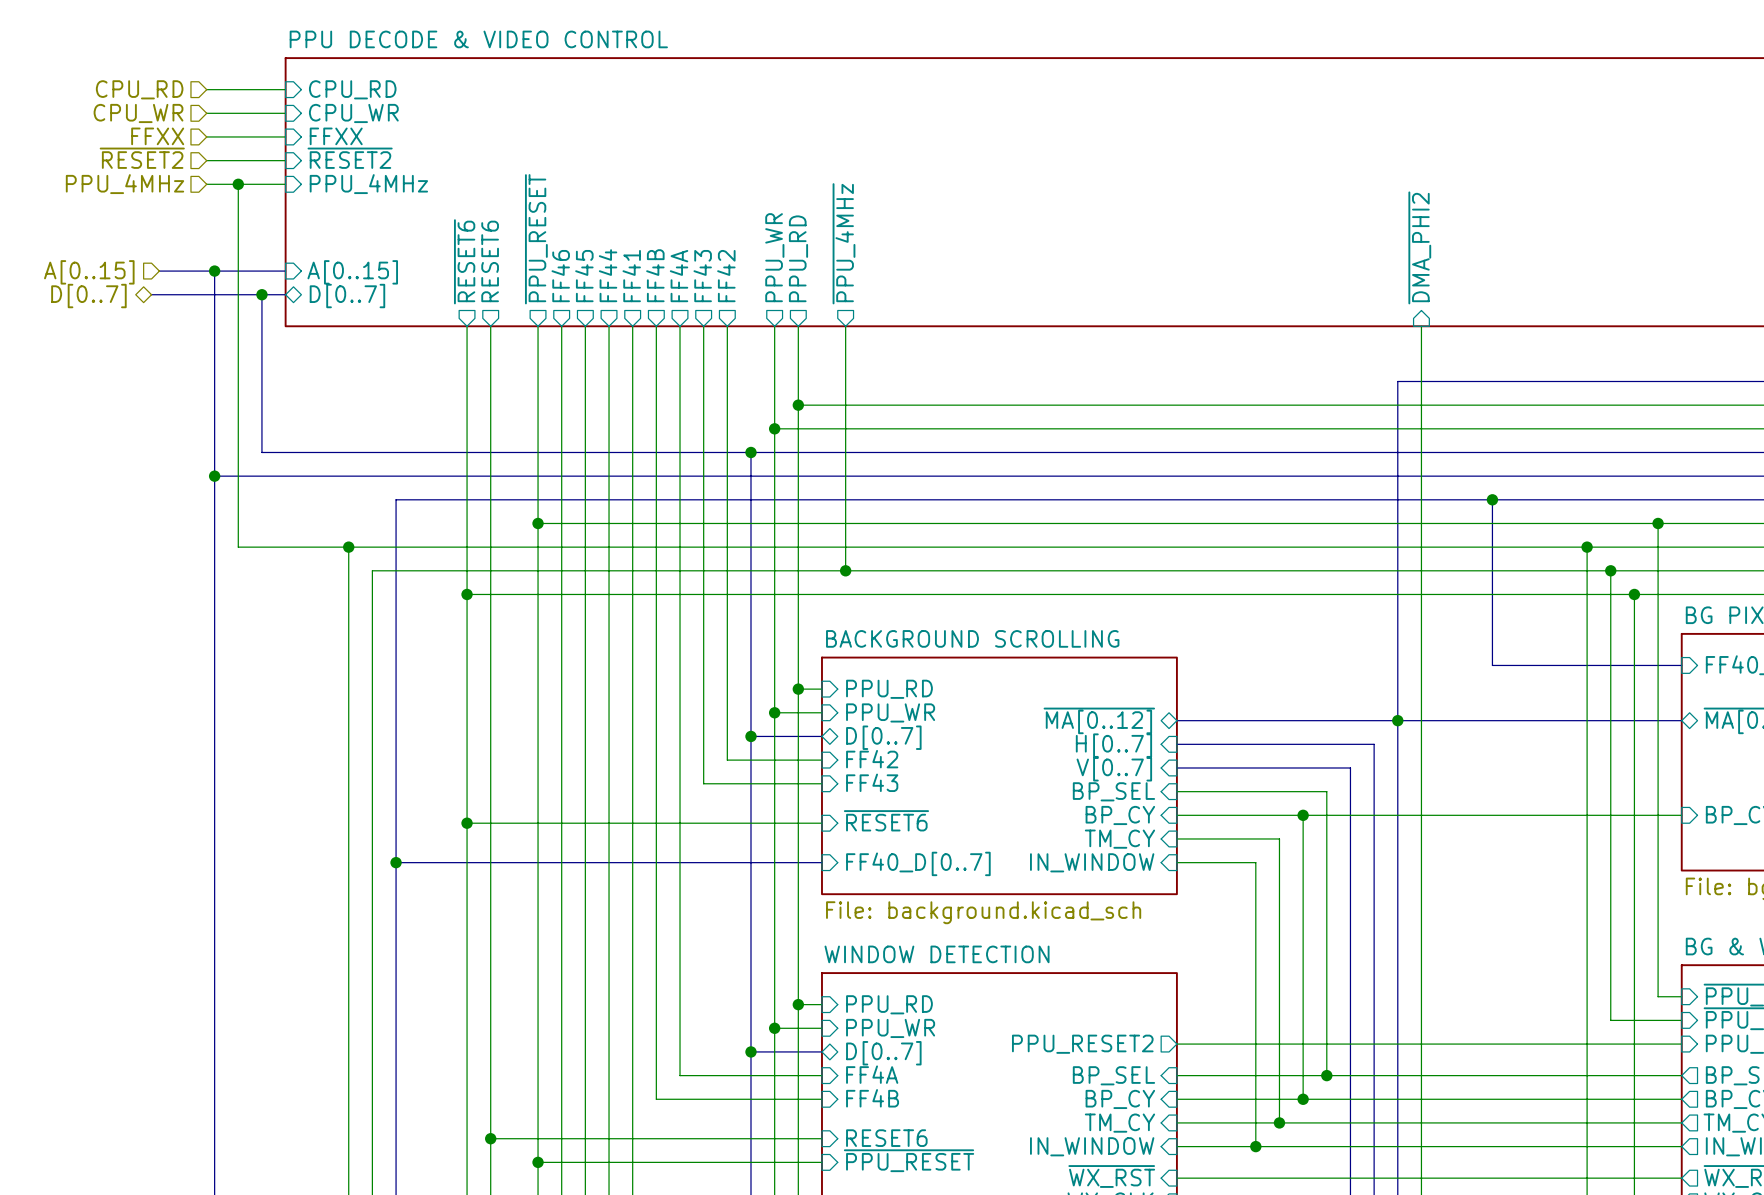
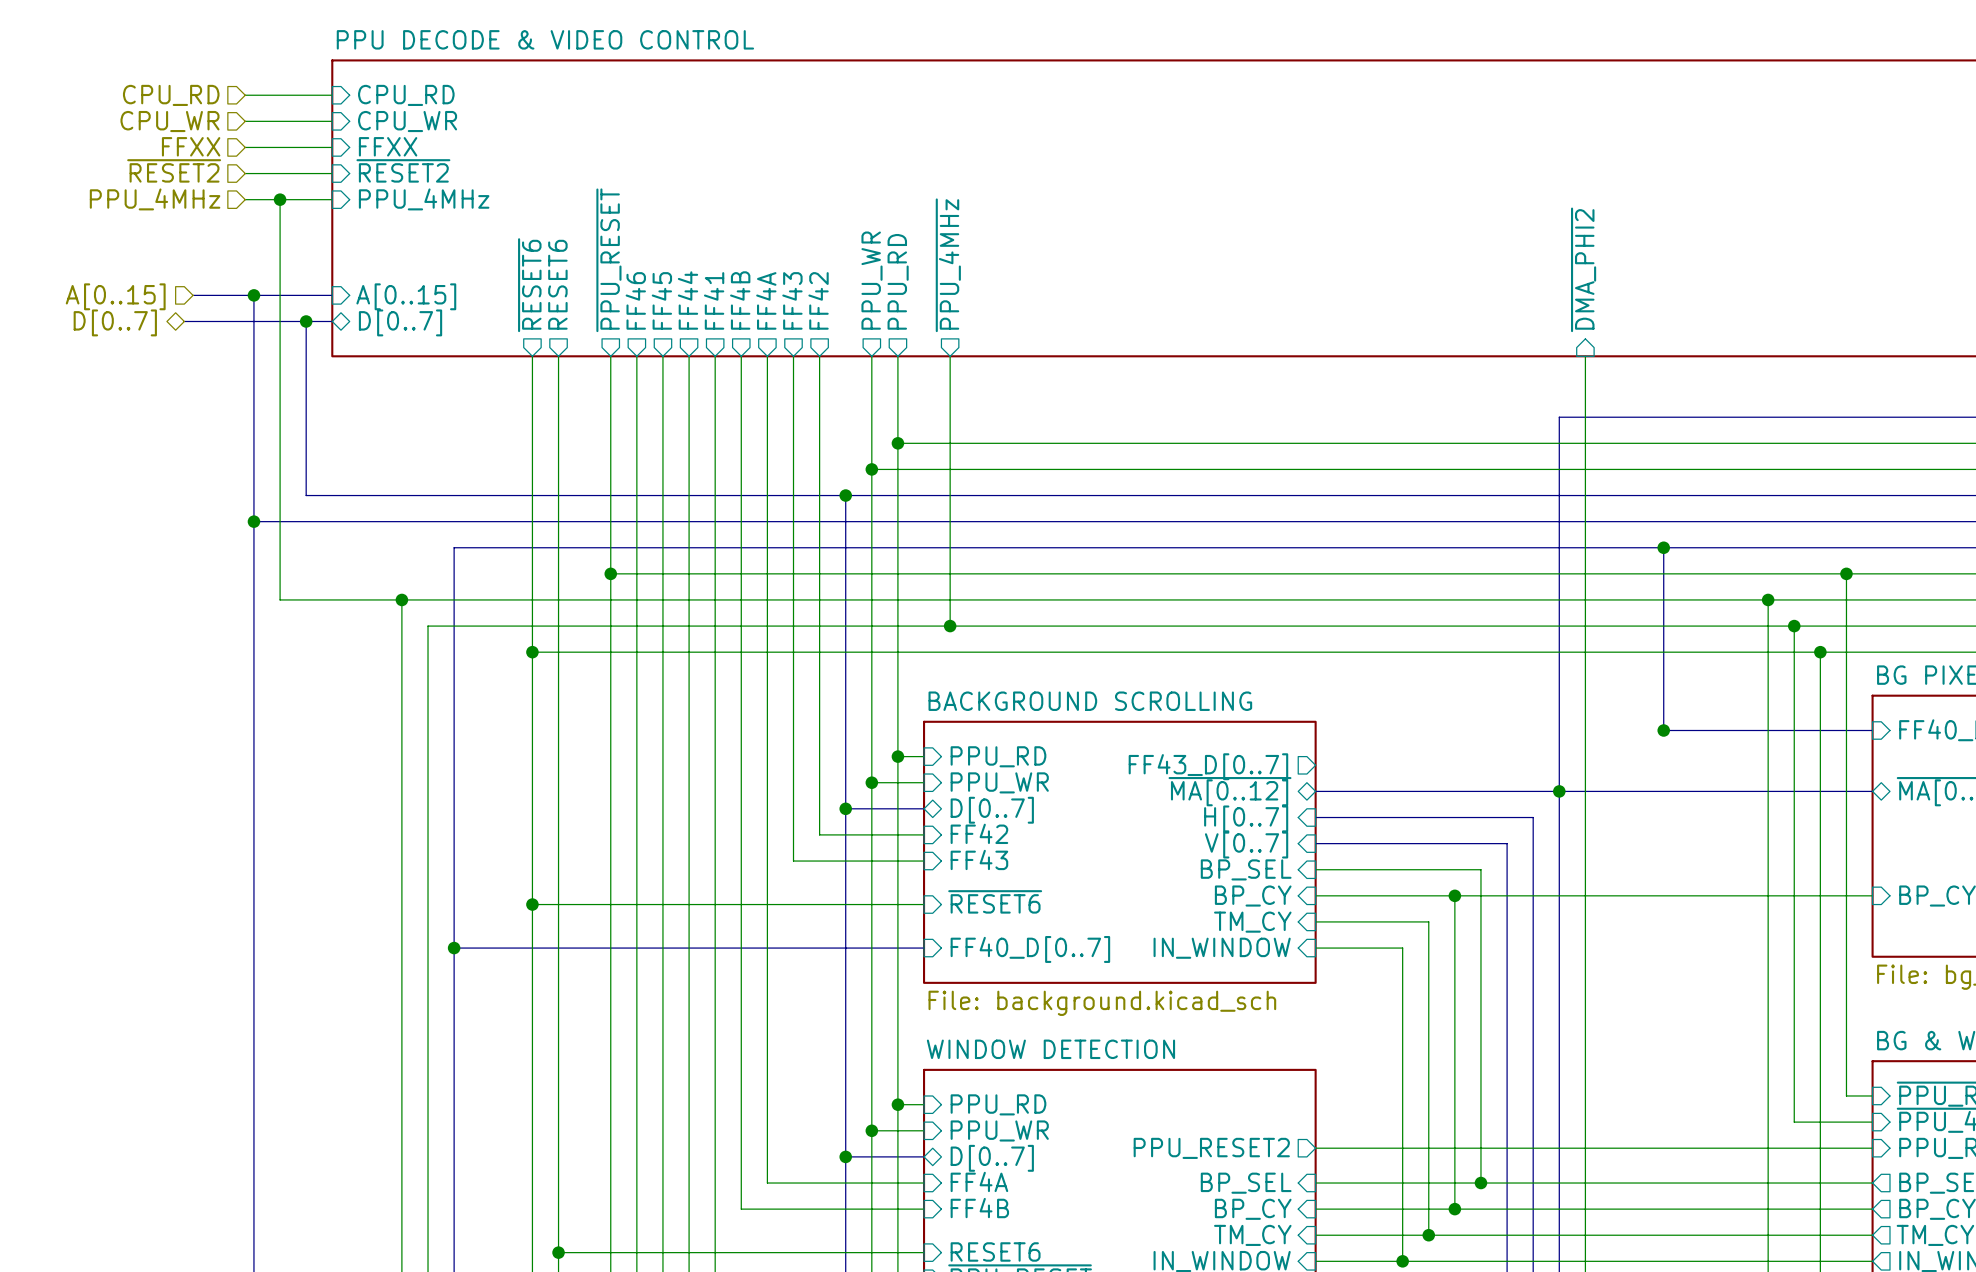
junction: none -> (1663, 730)
sheet pin: none -> FF43_D[0..7] (1208, 766)

